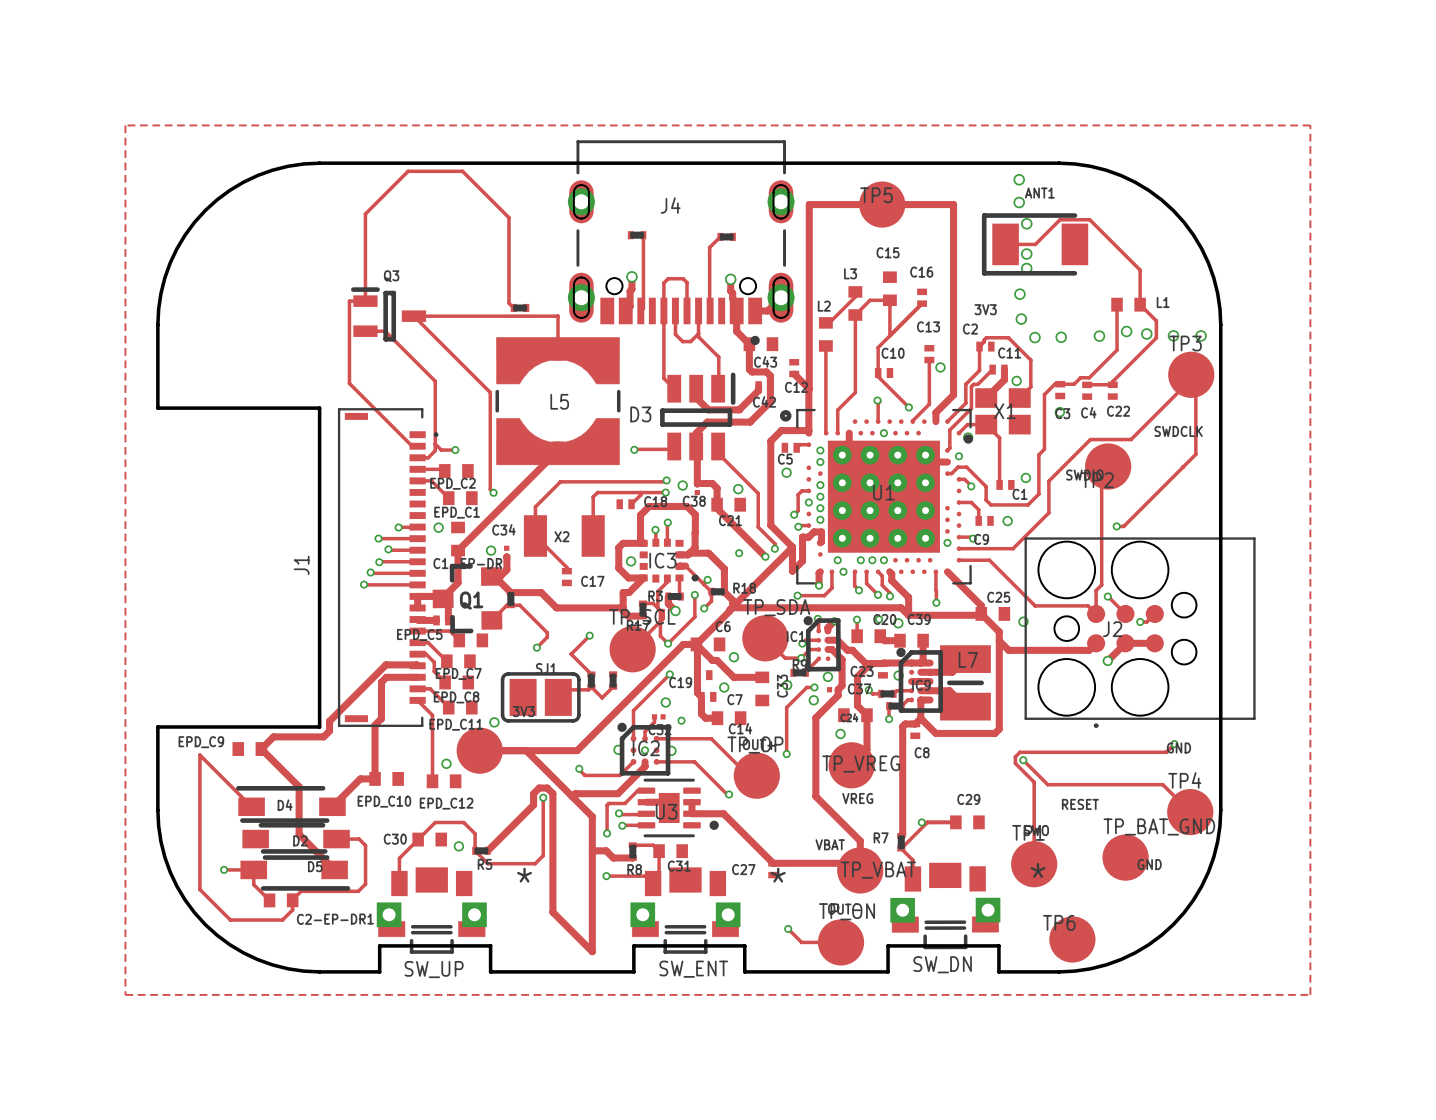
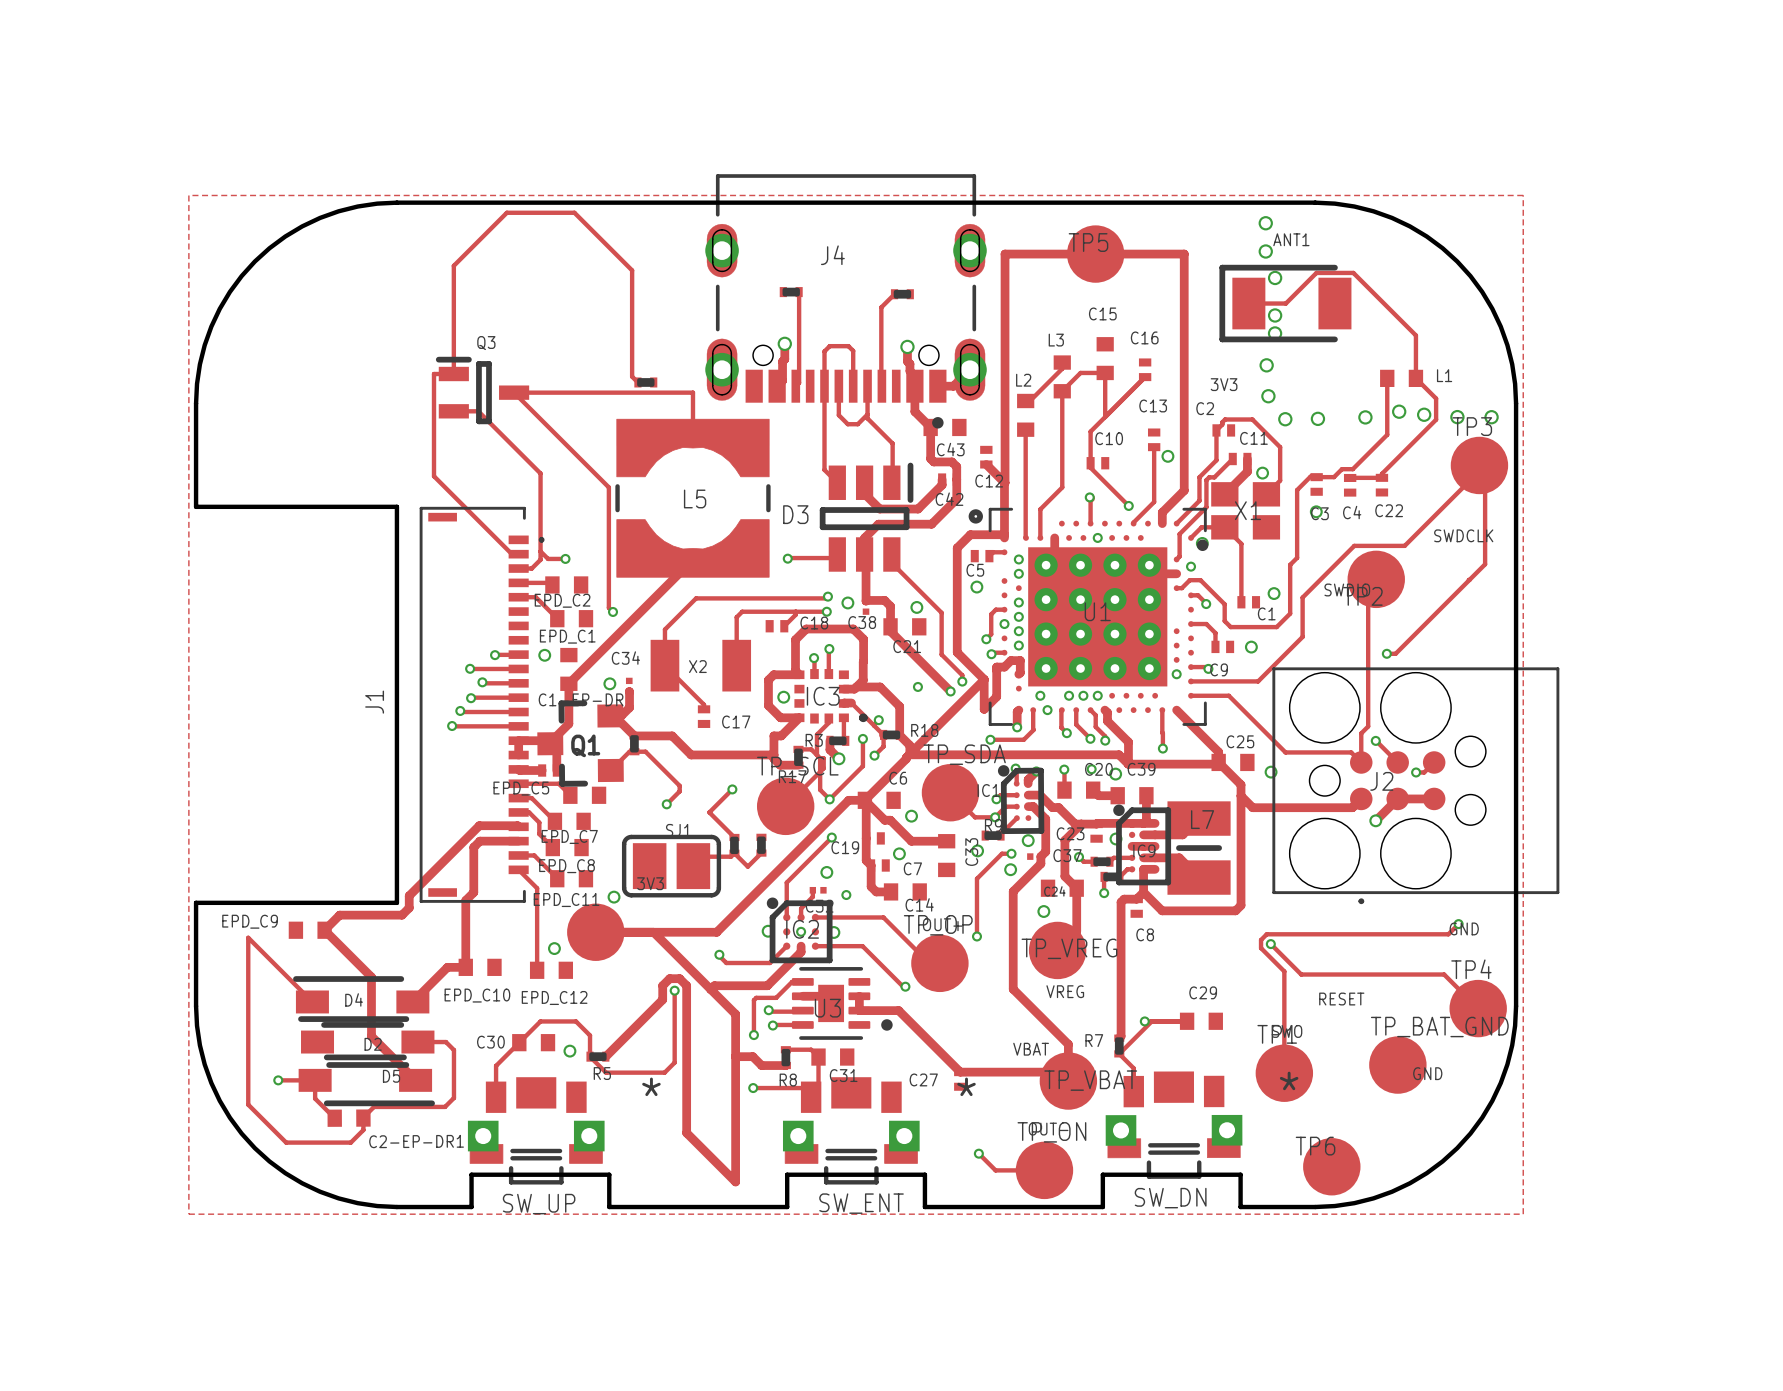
zone outline: (125, 125) (1310, 125) (1310, 994) (125, 994) (125, 125) -> (188, 195) (188, 1214) (1523, 1214) (1523, 195) (188, 195)

